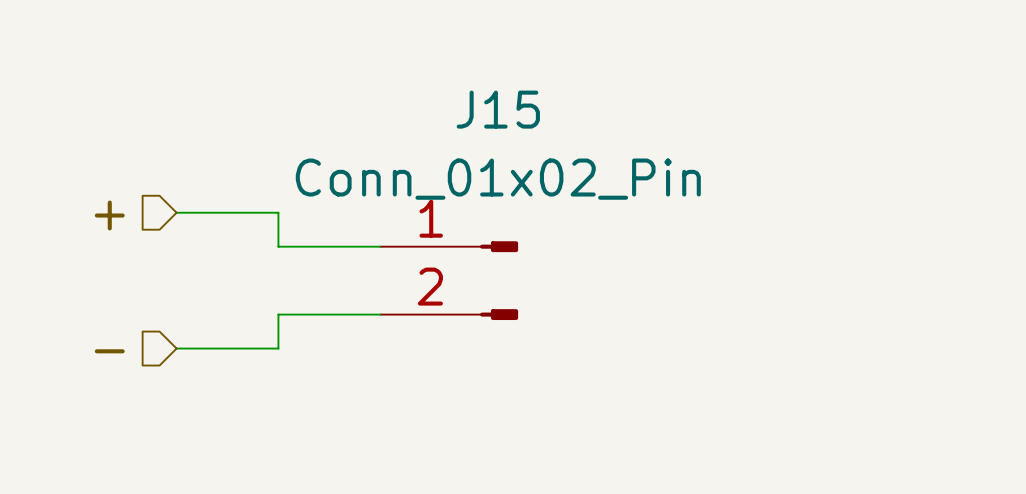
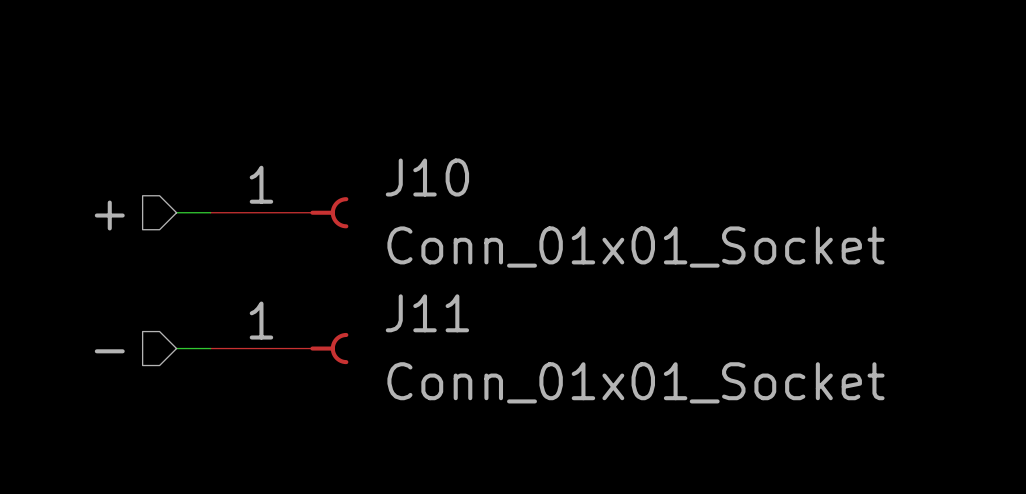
wire: (210, 212) (278, 212) (278, 246) (380, 246) -> none
J10: none -> Conn_01x01_Socket (279, 212)
J15: Conn_01x02_Pin (449, 280) -> none
wire: (380, 314) (278, 314) (278, 348) (210, 348) -> none
J11: none -> Conn_01x01_Socket (279, 348)

